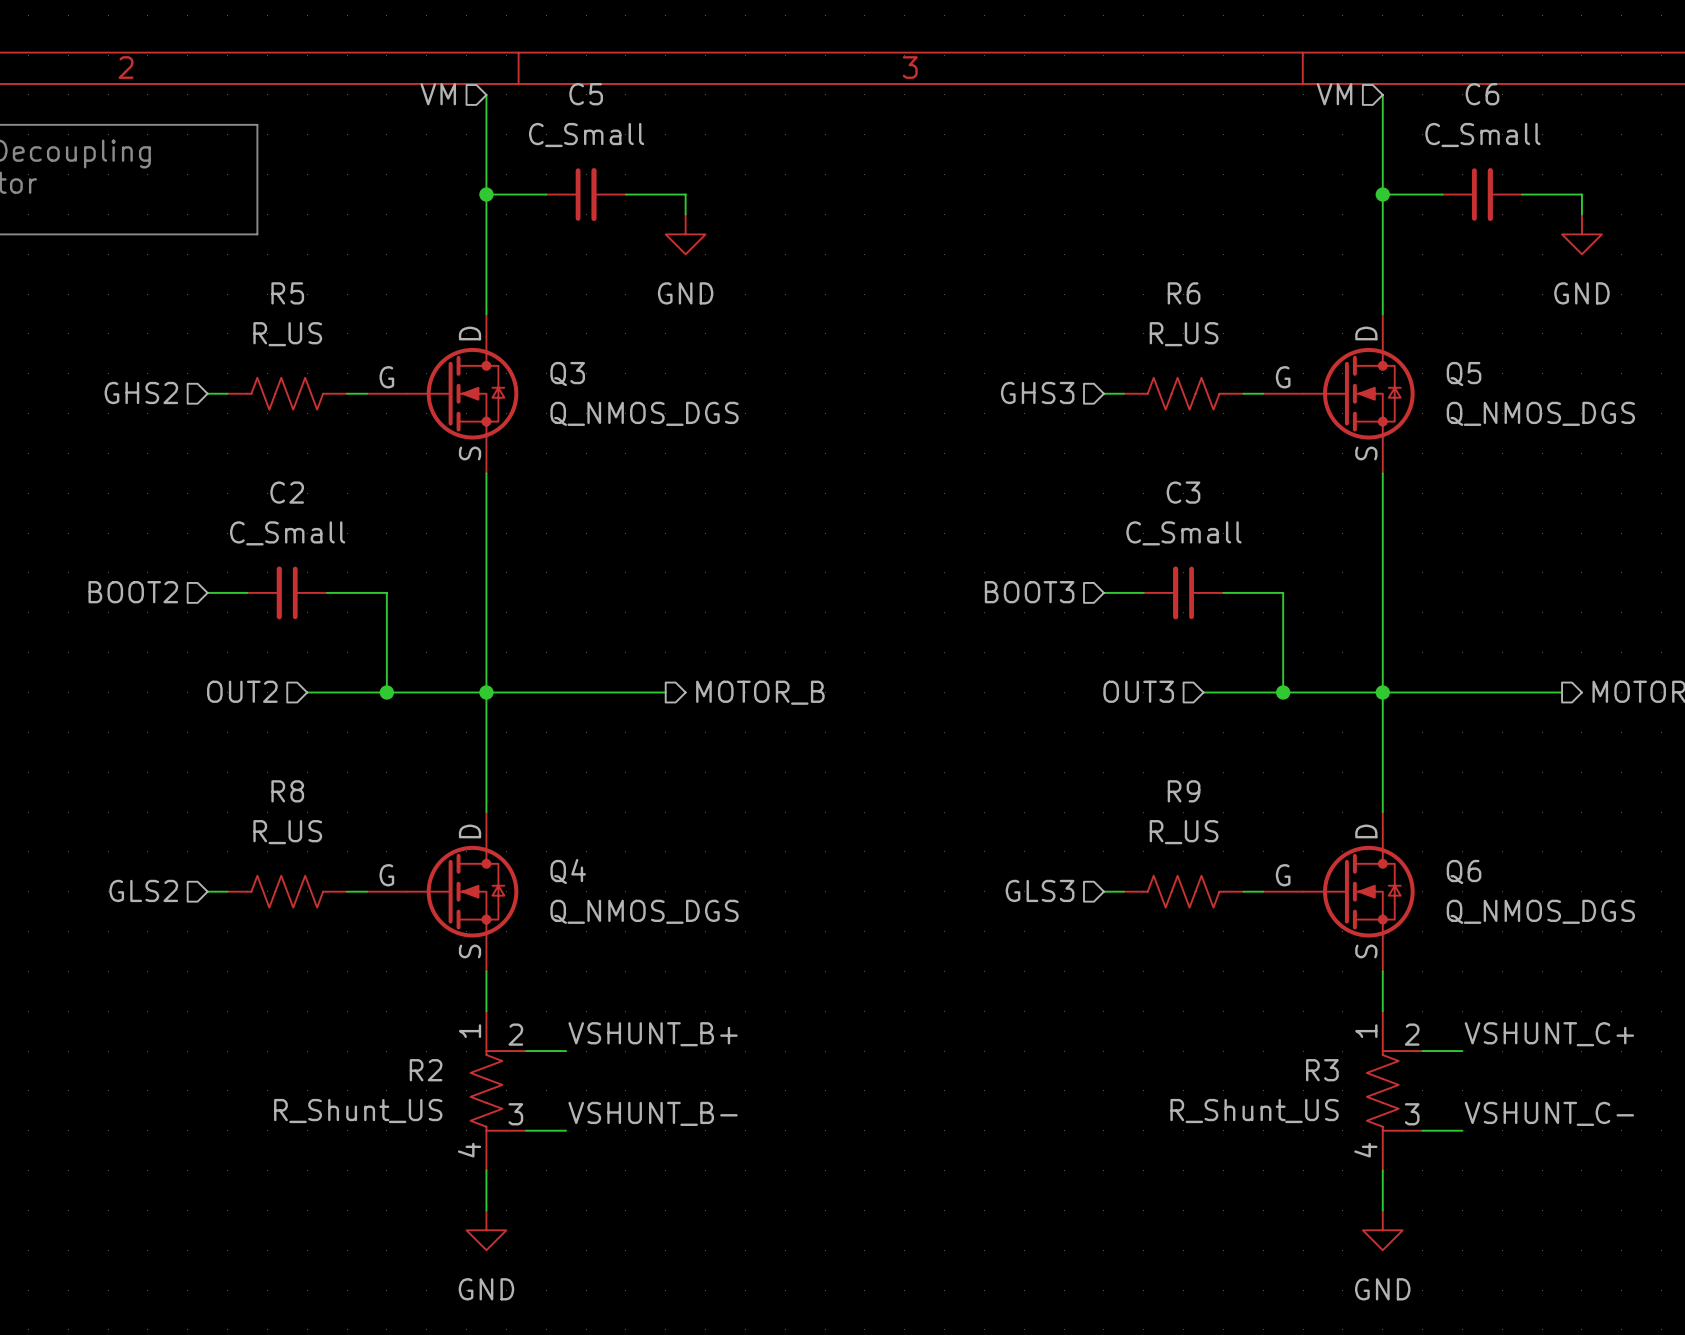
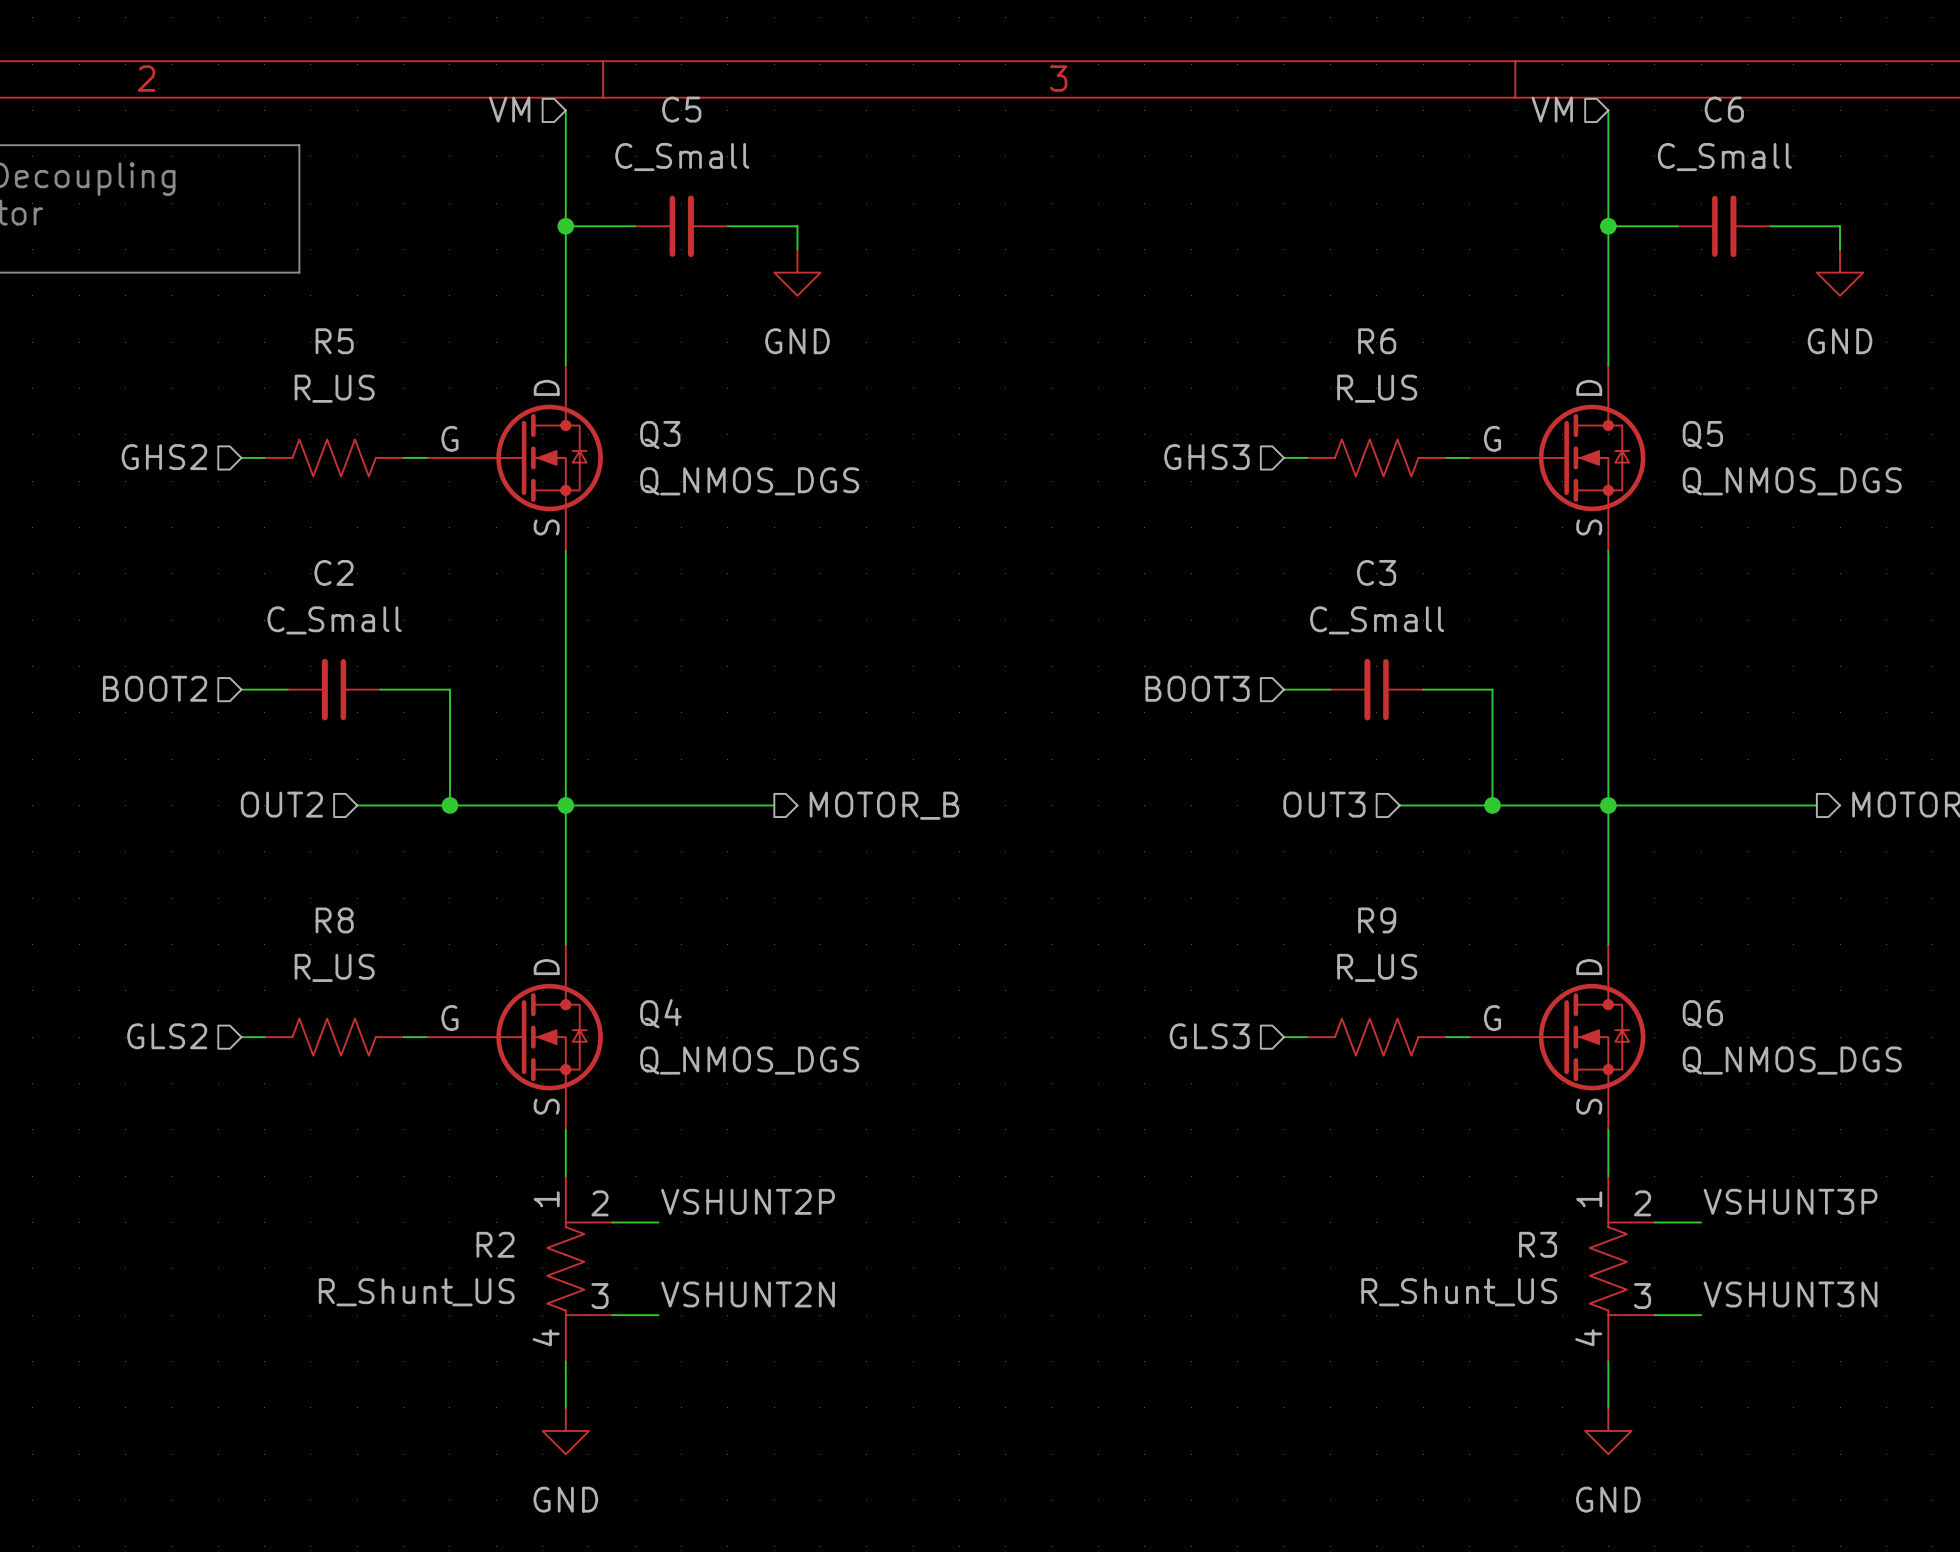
label: VSHUNT_B+ (653, 1034) -> VSHUNT2P (748, 1201)
label: VSHUNT_C+ (1549, 1034) -> VSHUNT3P (1790, 1201)
label: VSHUNT_B- (653, 1113) -> VSHUNT2N (748, 1294)
label: VSHUNT_C- (1549, 1113) -> VSHUNT3N (1790, 1294)

